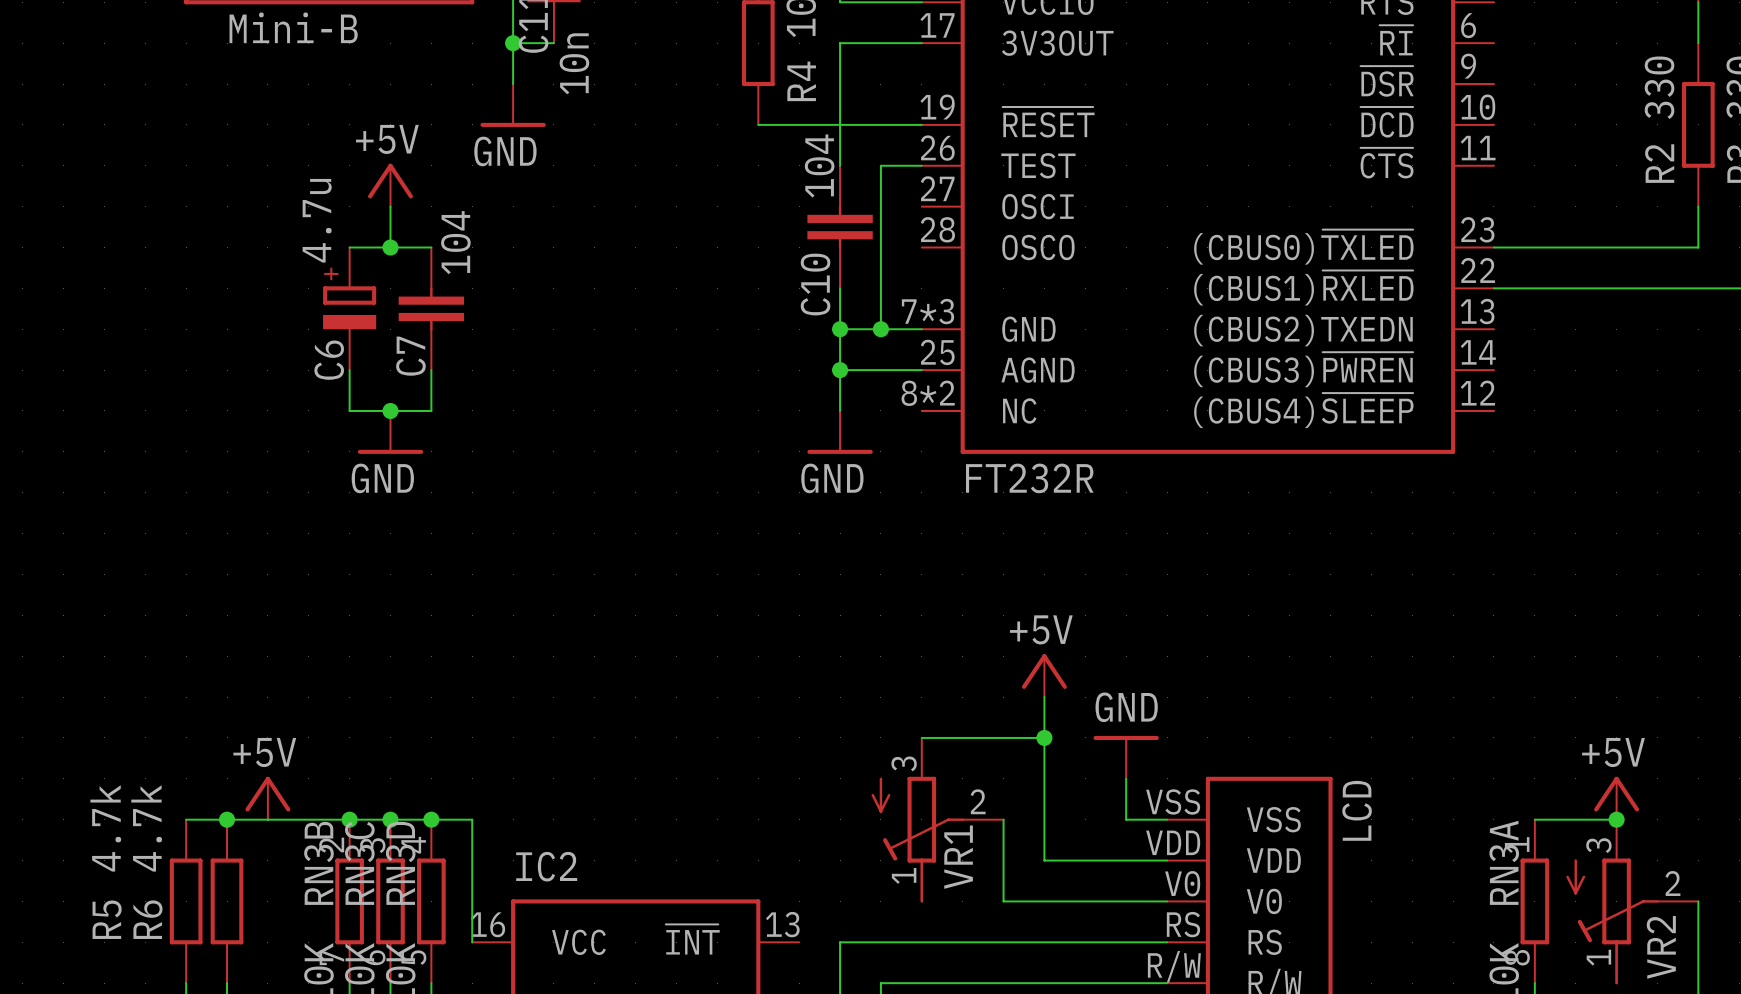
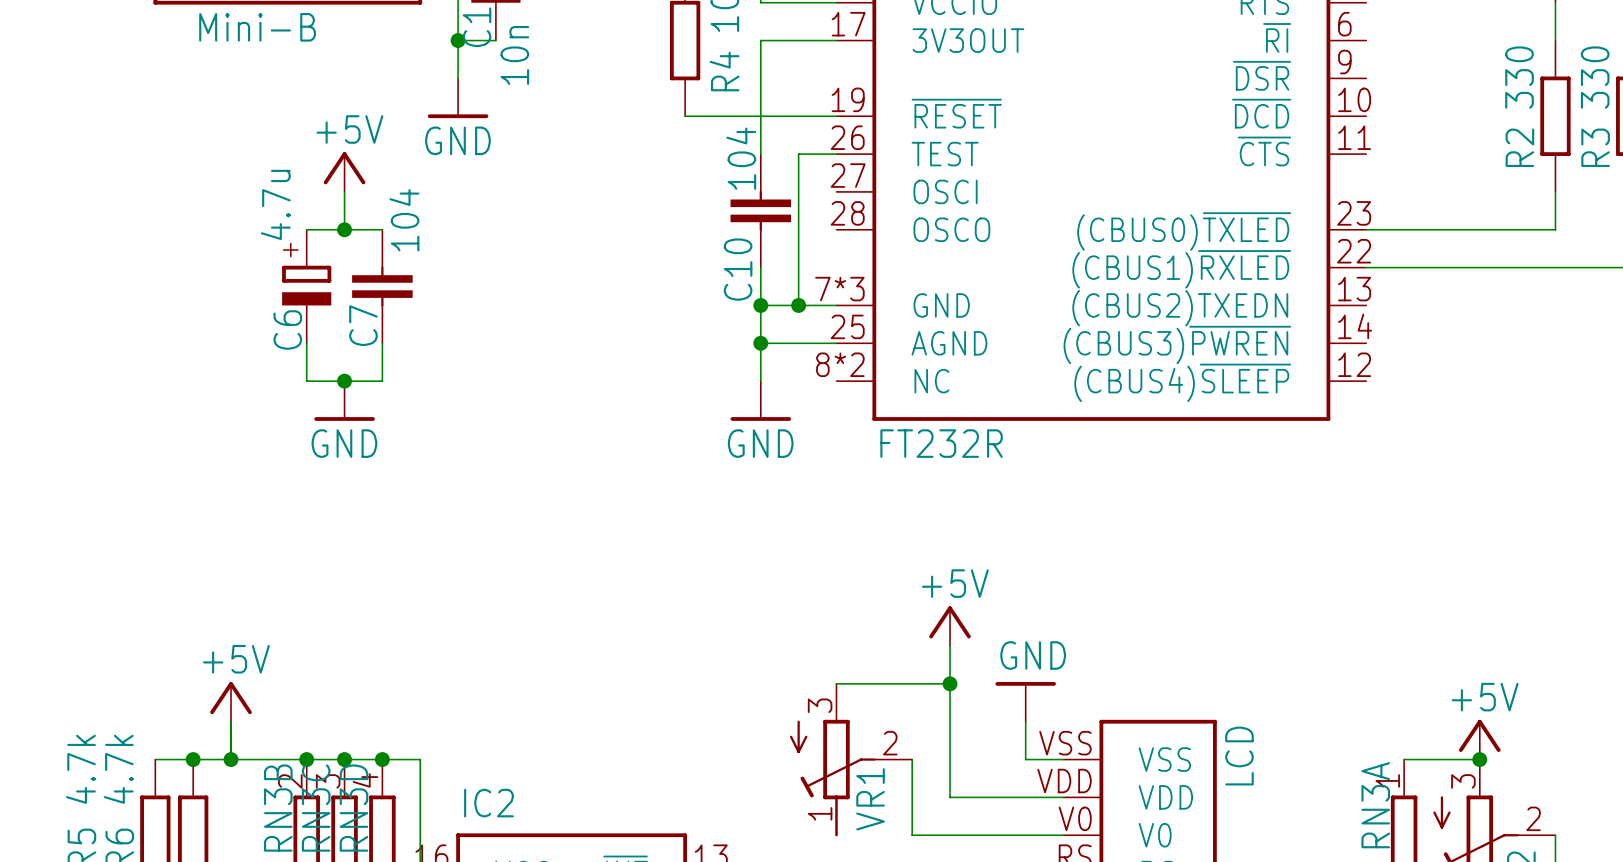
power symbol position: +5V (267, 798) -> +5V (231, 701)
junction: none -> (231, 759)

